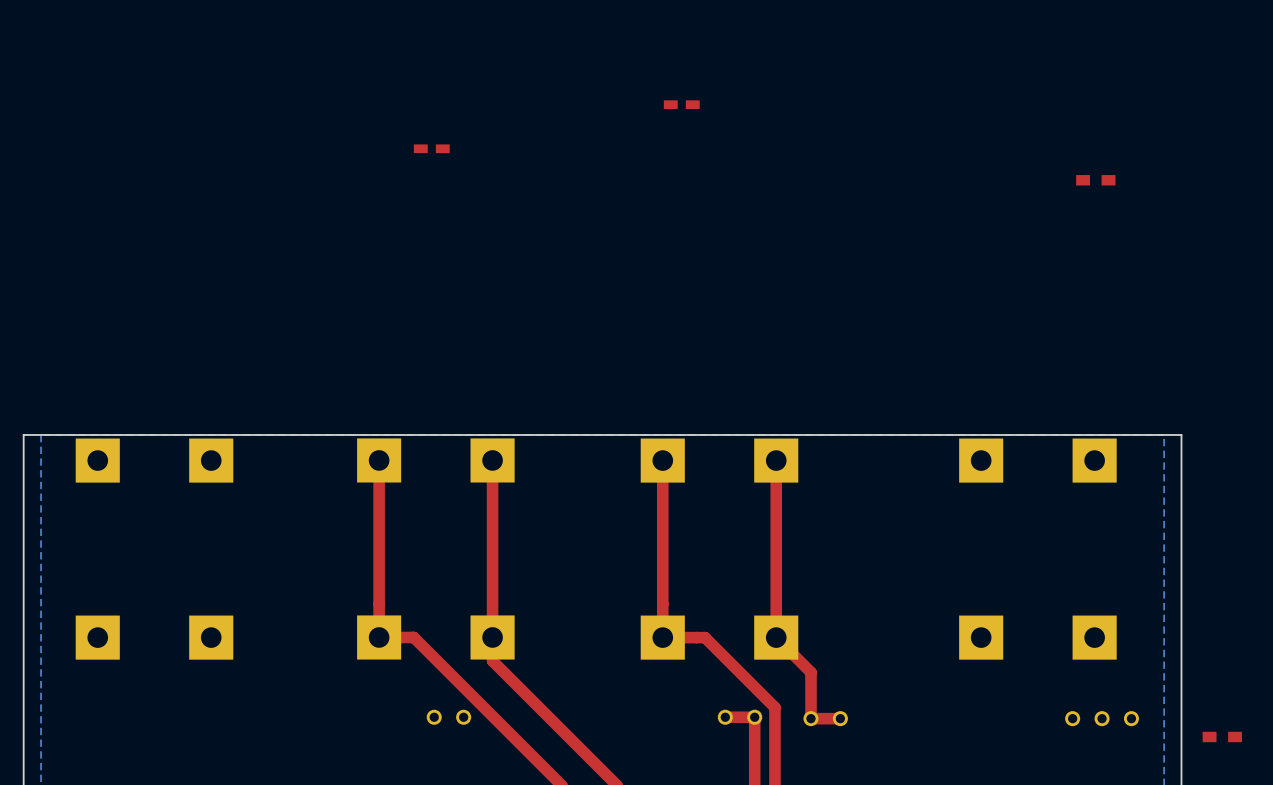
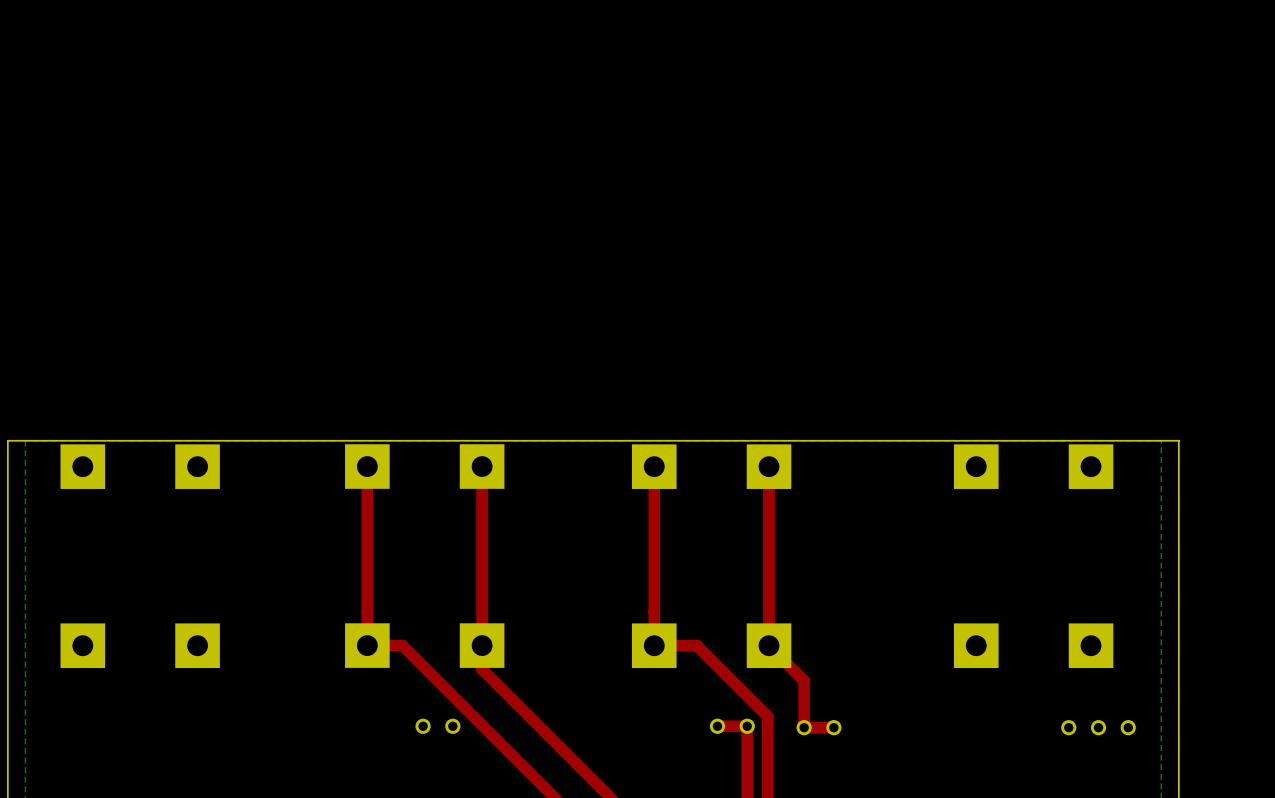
part: (681, 104) -> none
part: (431, 148) -> none
part: (1095, 180) -> none
part: (1222, 737) -> none

